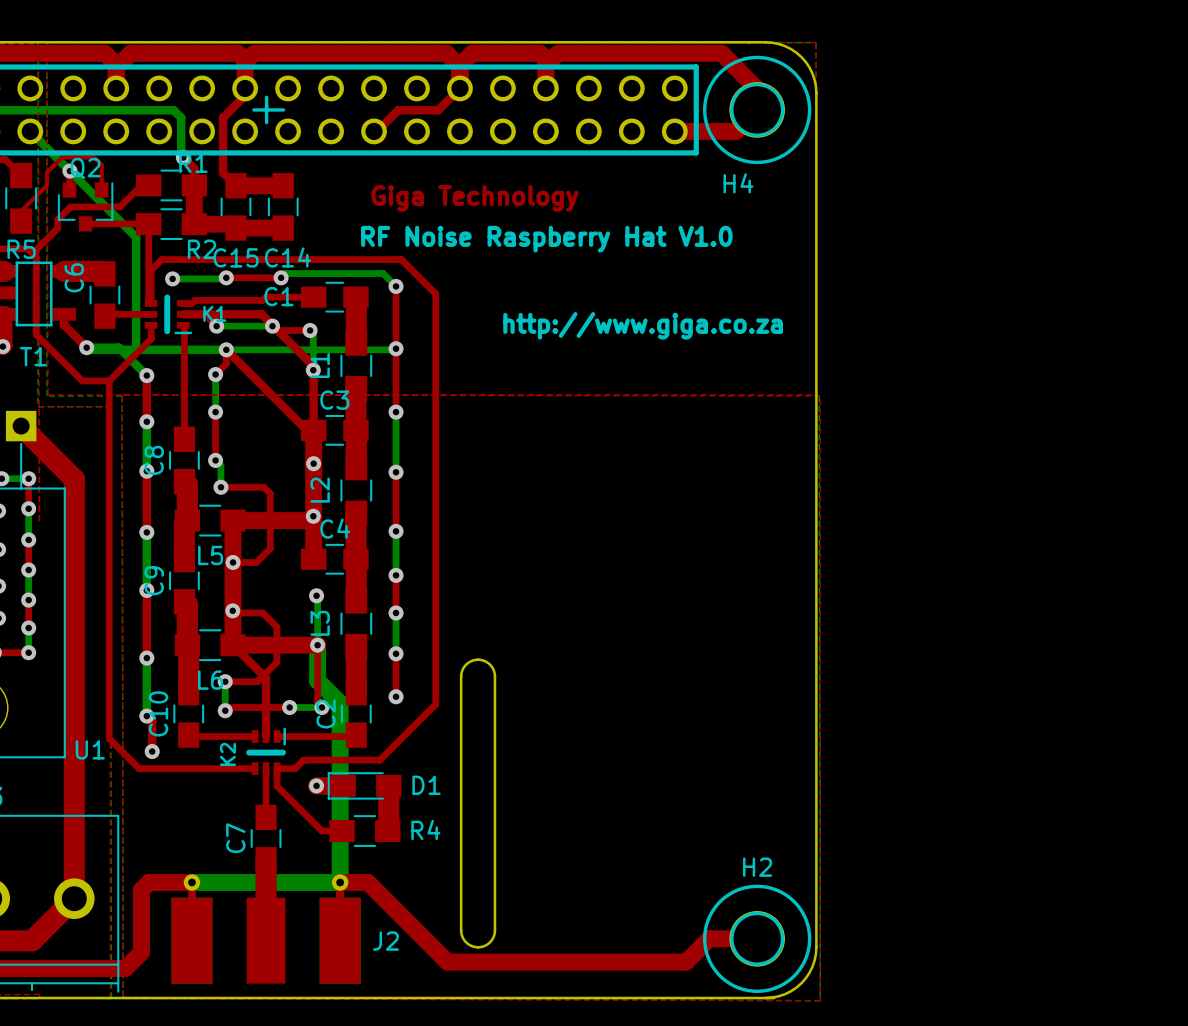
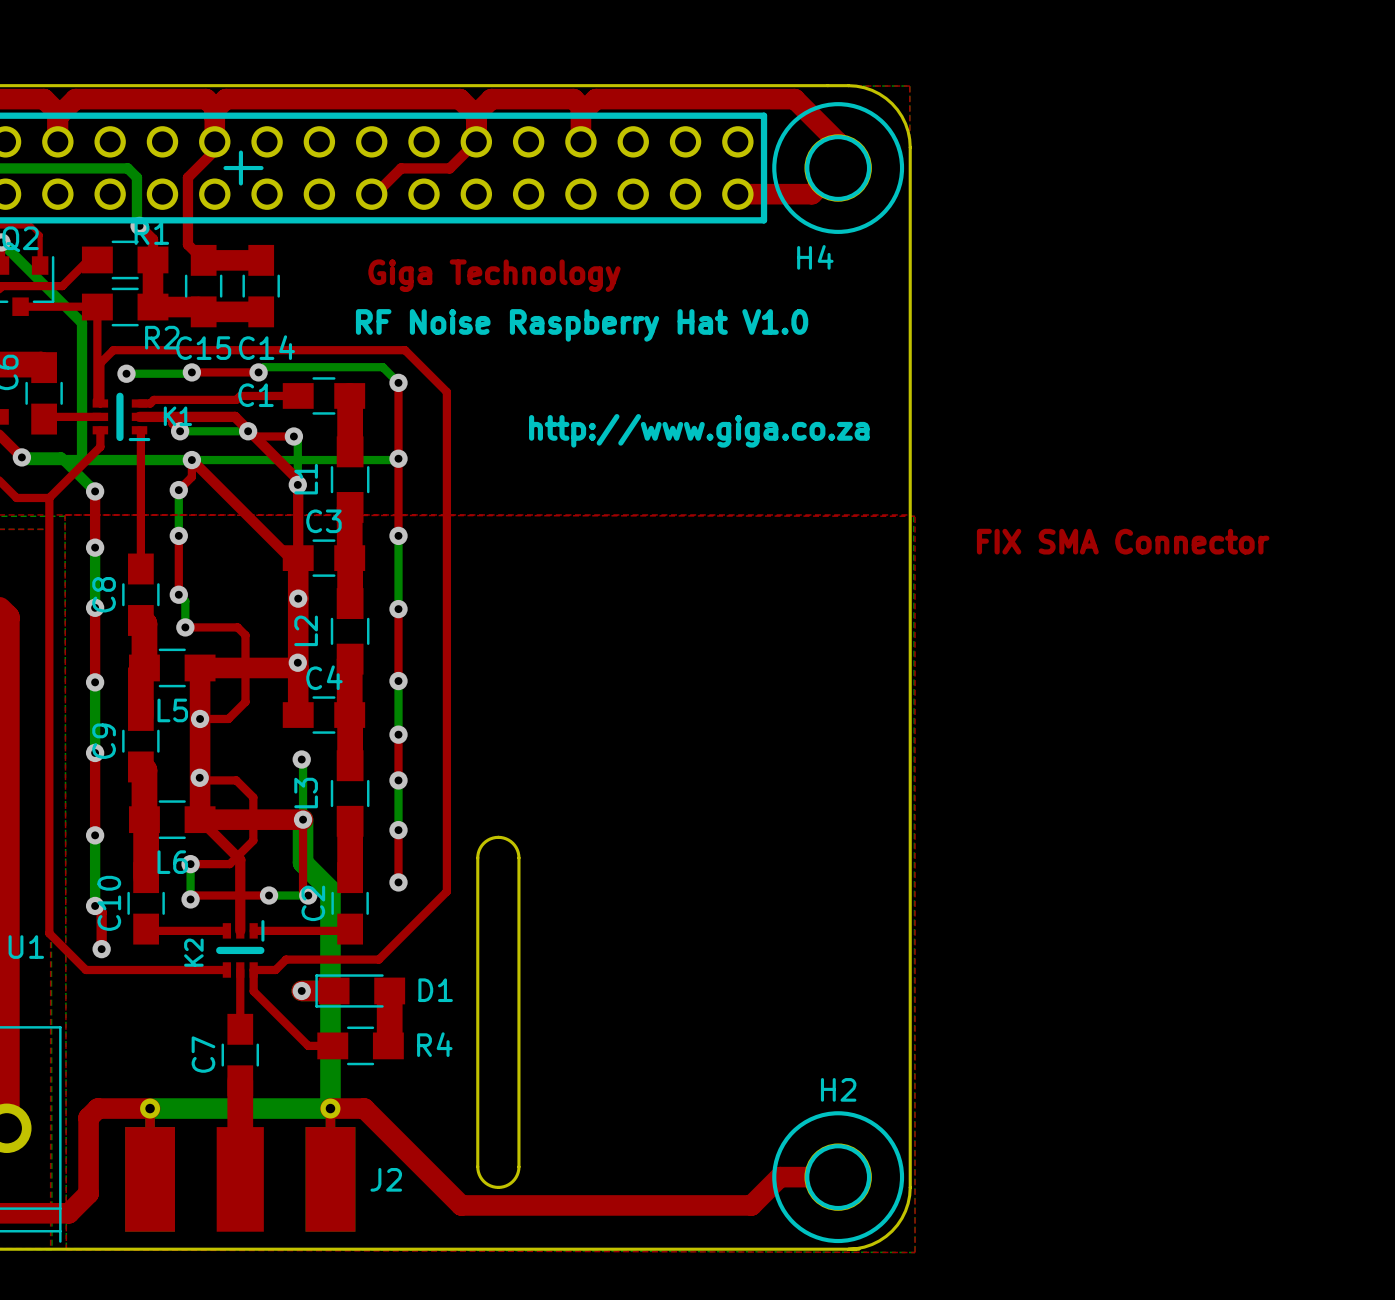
text: none -> FIX SMA Connector (1123, 541)

